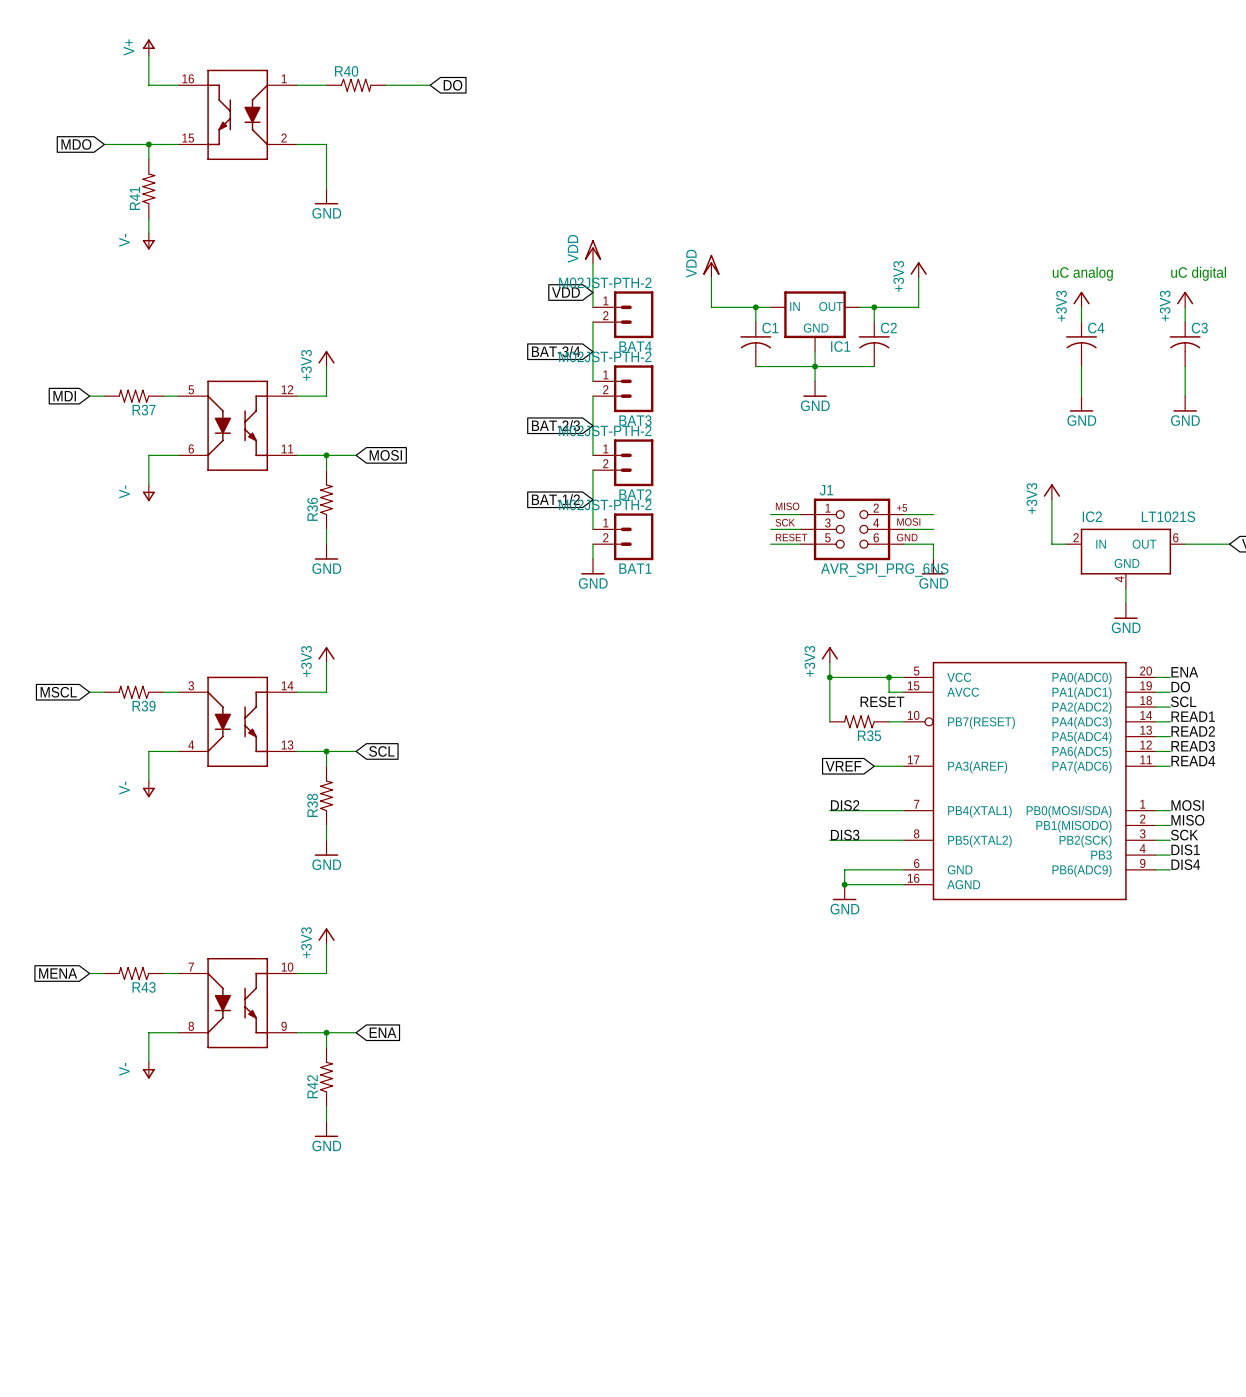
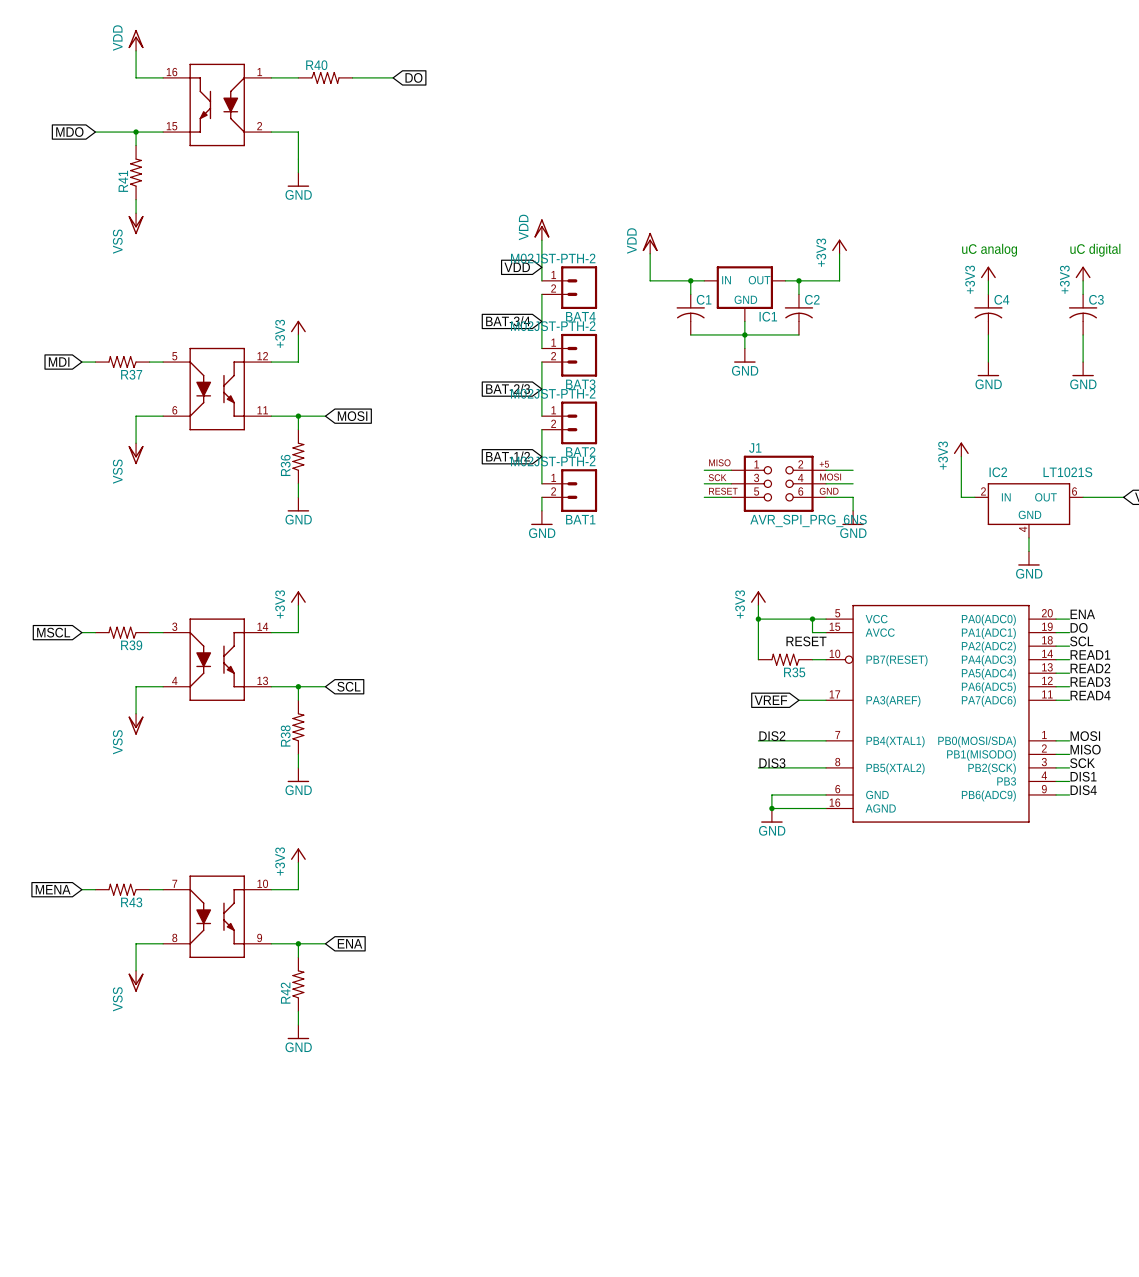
power symbol: V+ (148, 47) -> VDD (136, 40)
power symbol: V- (148, 241) -> VSS (136, 223)
power symbol: V- (148, 493) -> VSS (136, 453)
power symbol: V- (148, 789) -> VSS (136, 724)
power symbol: V- (148, 1070) -> VSS (136, 981)

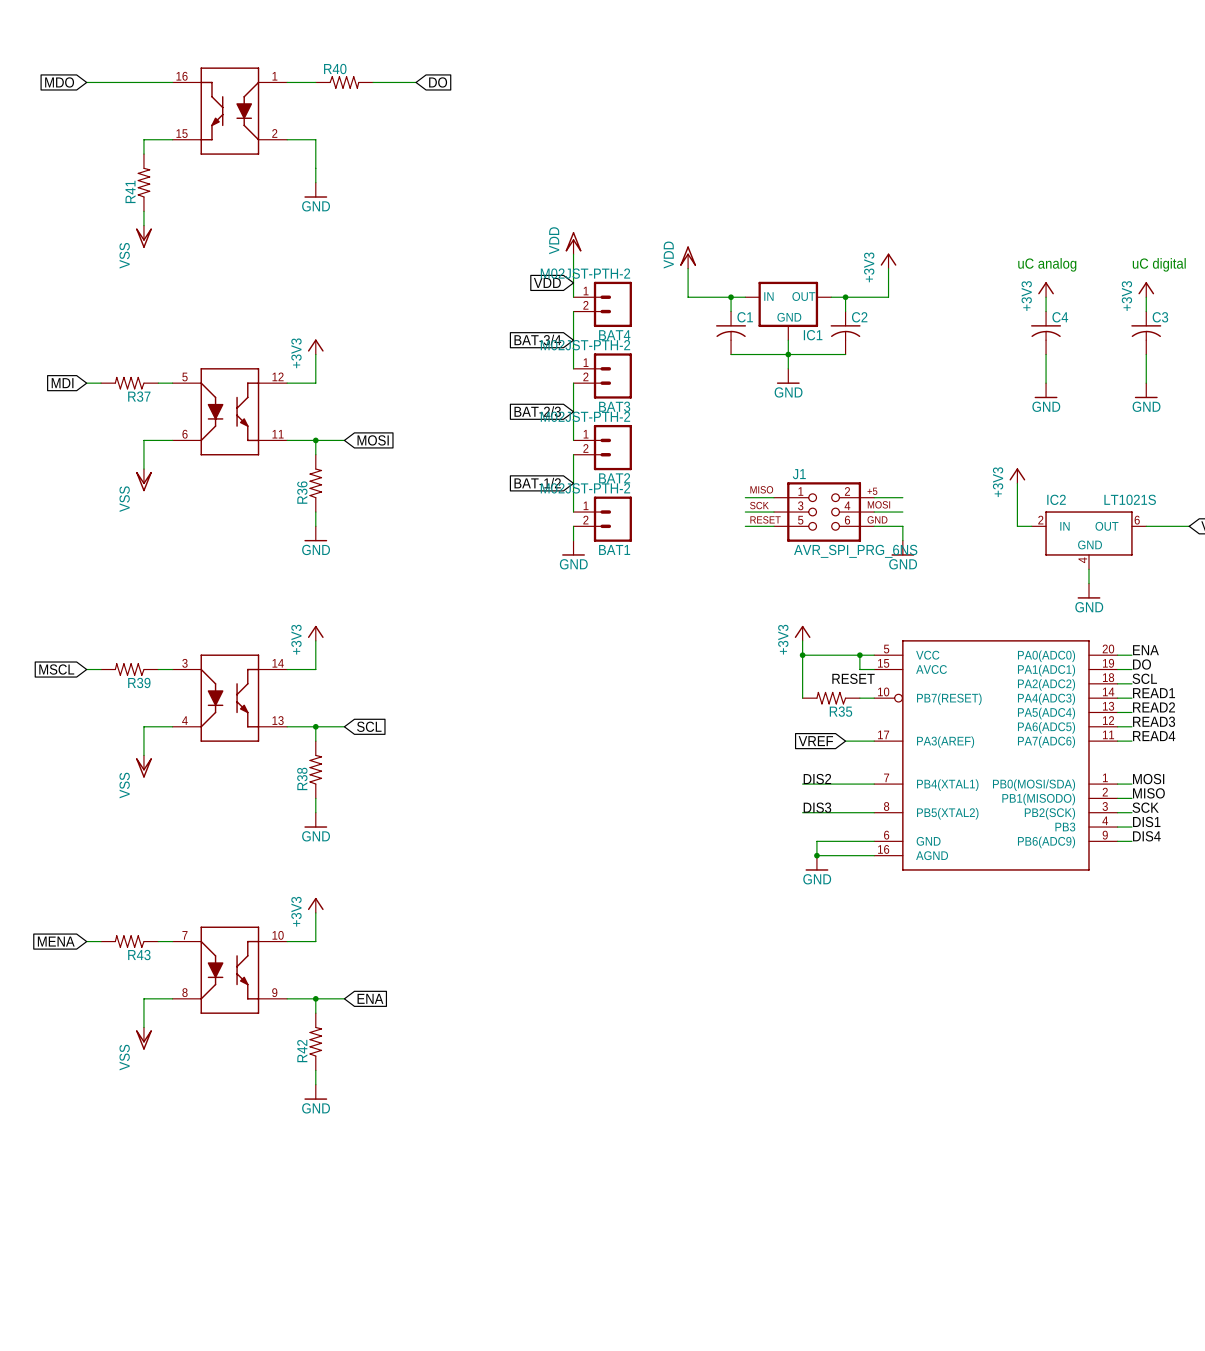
power symbol: VDD (136, 40) -> none
wire: (136, 50) (136, 77) -> (86, 82) (143, 82)
global label position: MDO (69, 132) -> MDO (59, 82)
wire: (95, 132) (136, 132) -> none
junction: (136, 132) -> none

